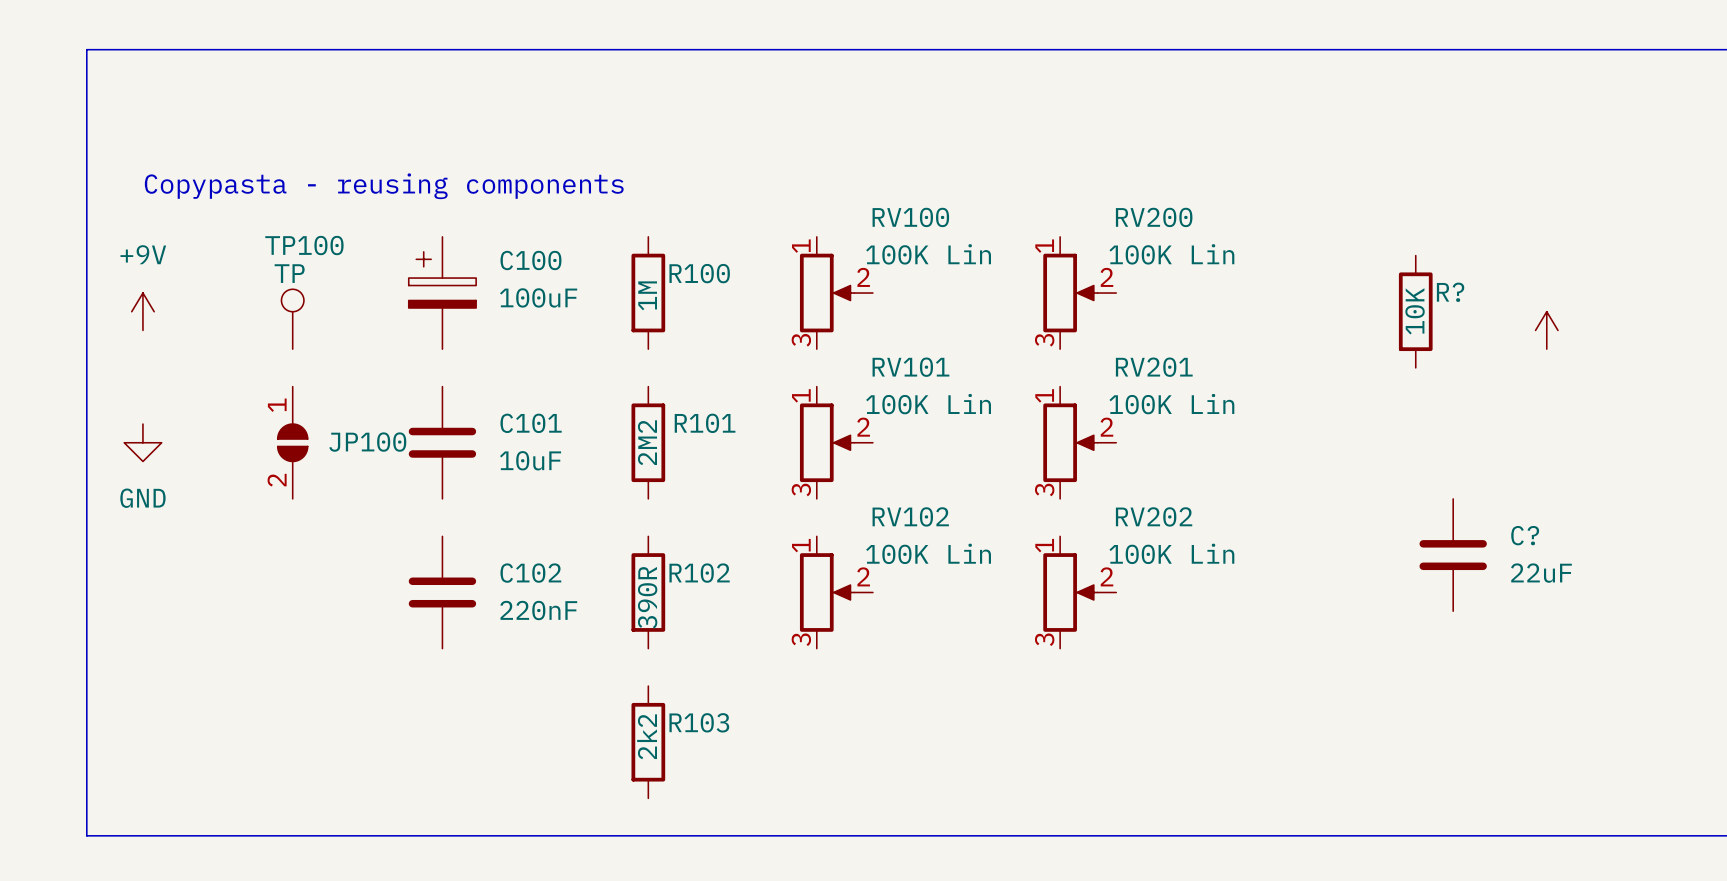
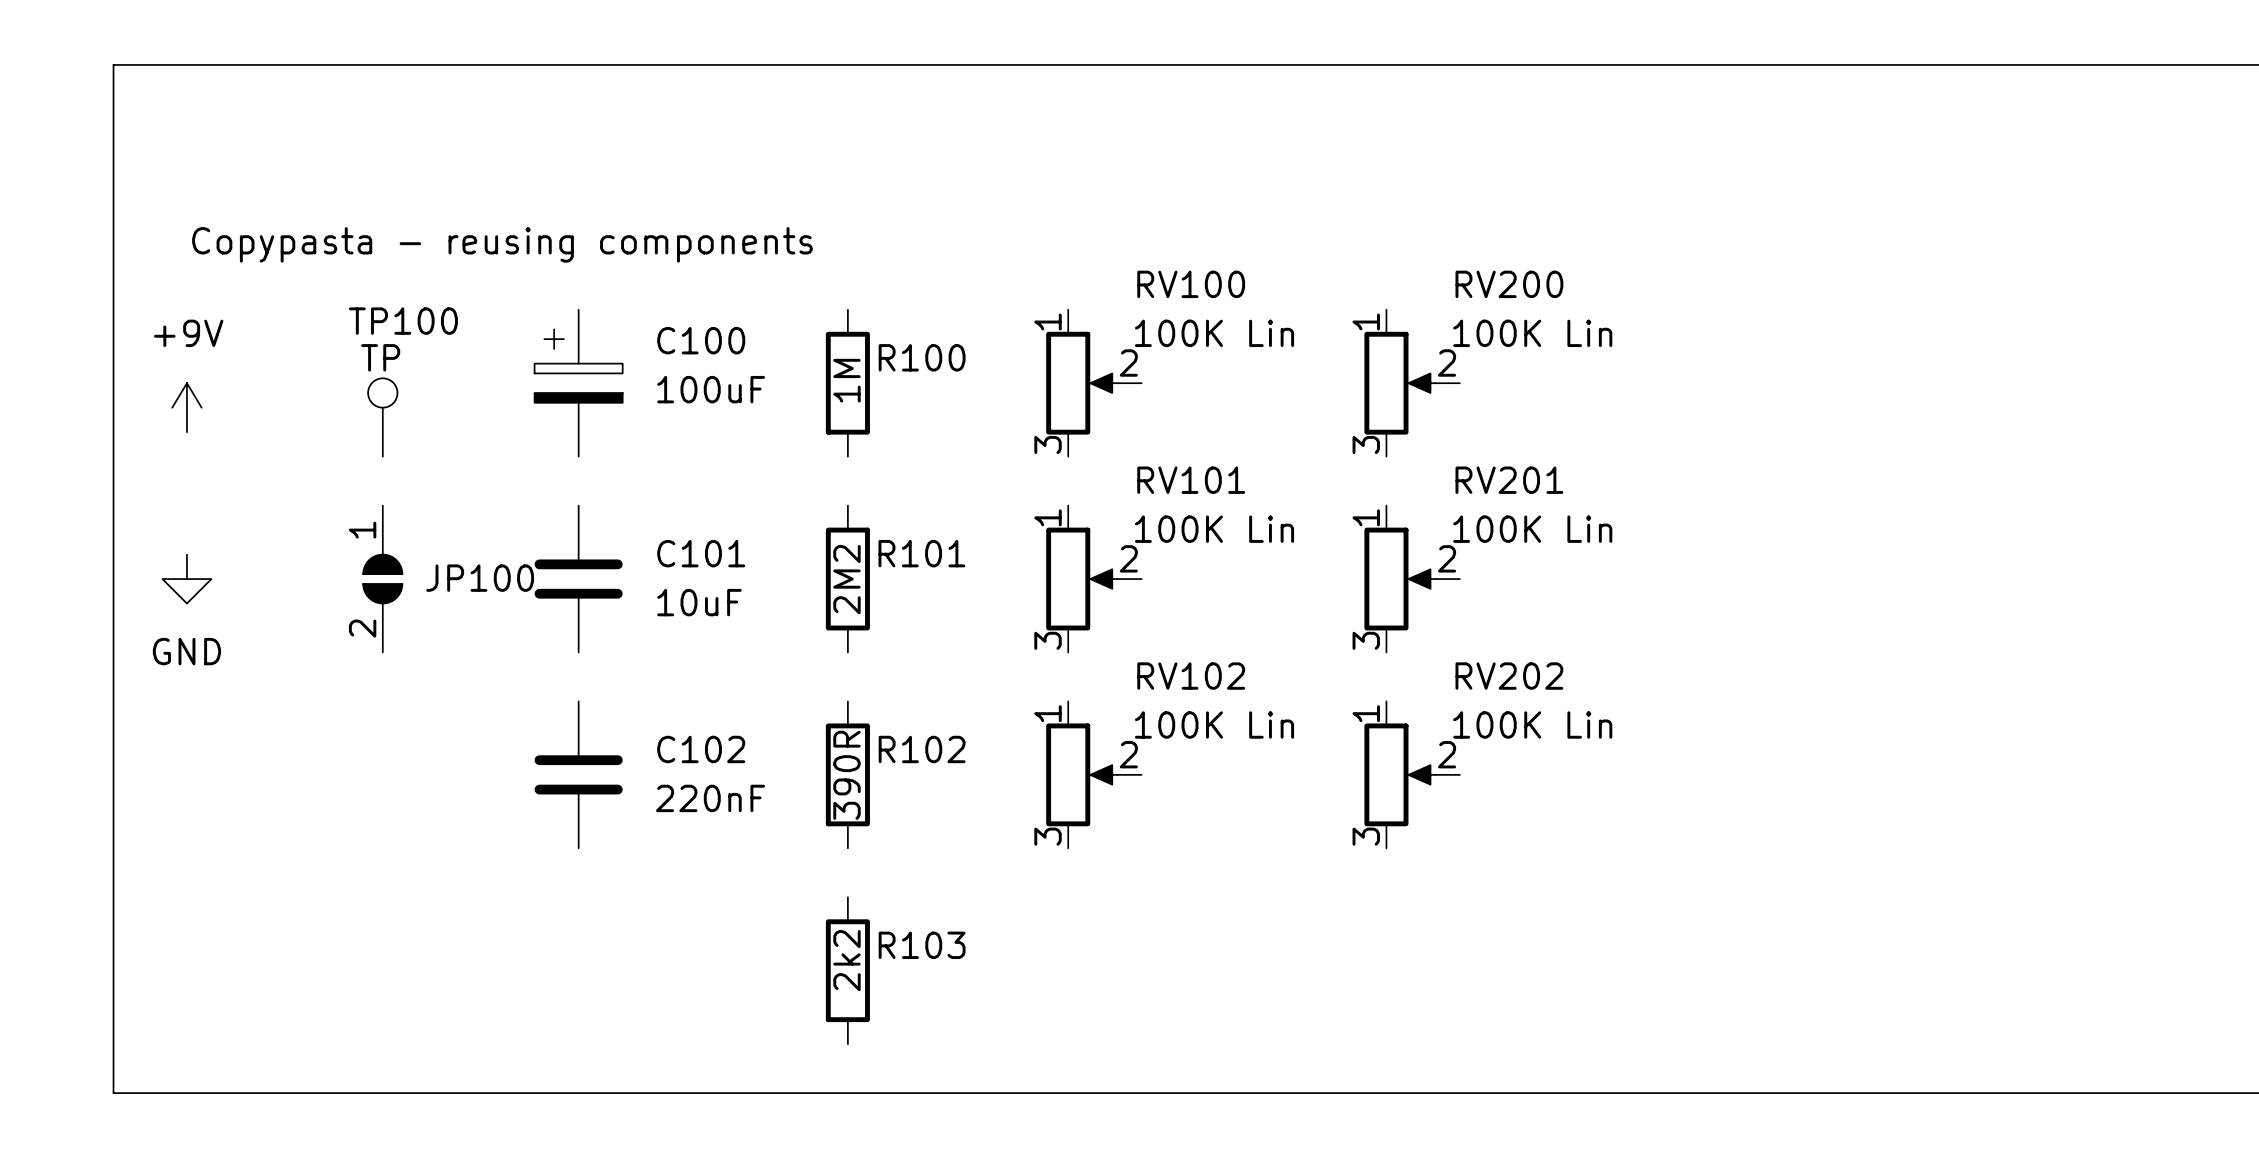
R?: 10K (1415, 311) -> none
power symbol: (1546, 330) -> none
C?: 22uF (1453, 555) -> none

